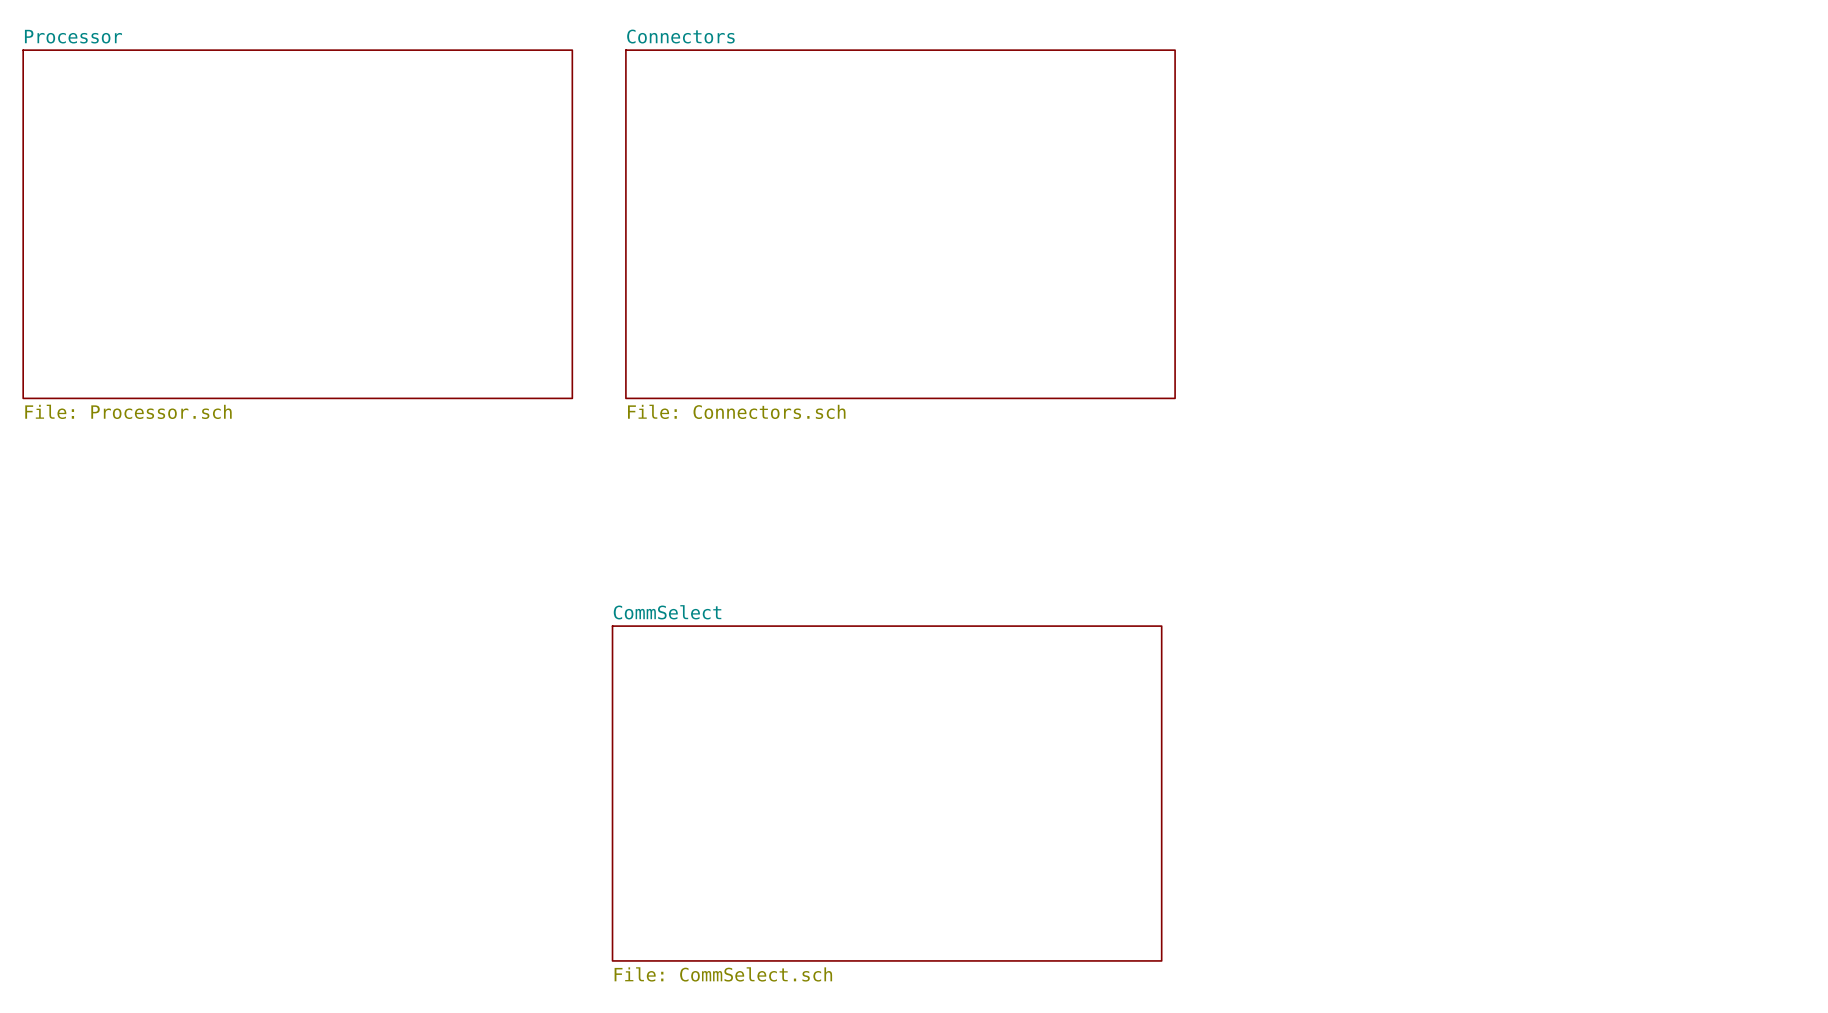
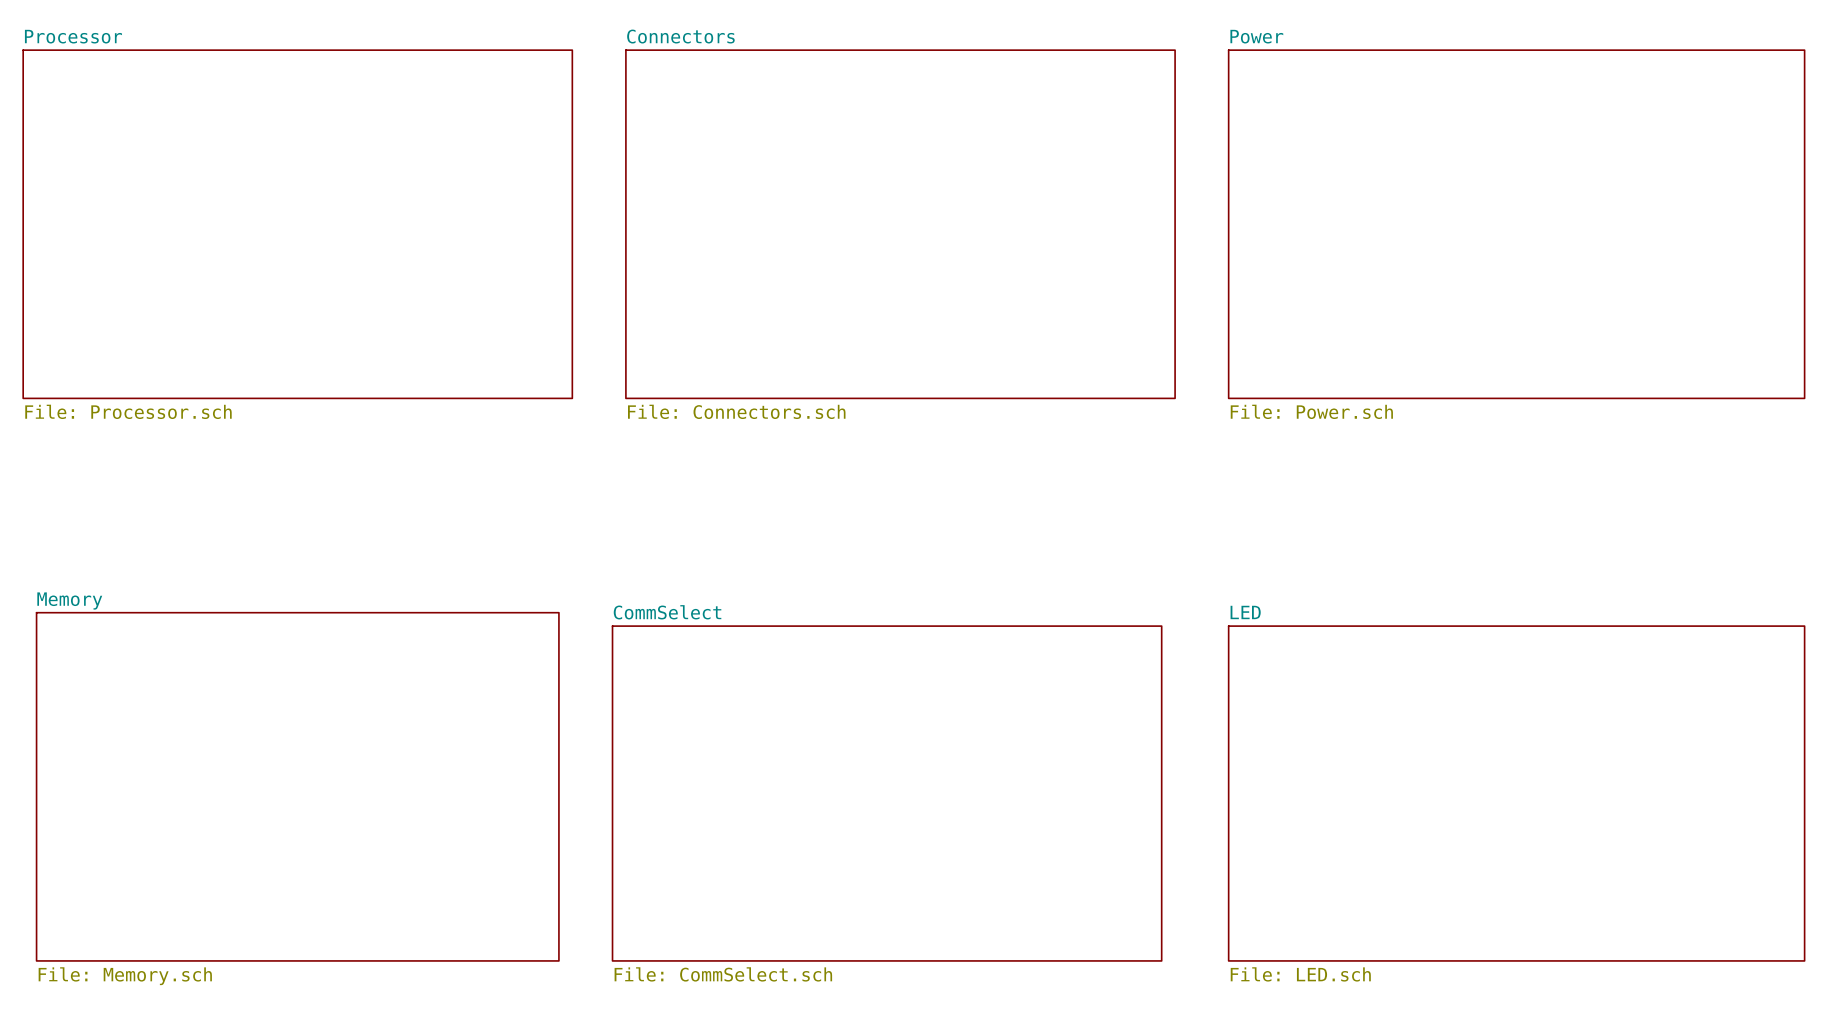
sheet Power: none -> File: Power.sch (1516, 224)
sheet Memory: none -> File: Memory.sch (297, 786)
sheet LED: none -> File: LED.sch (1516, 793)

